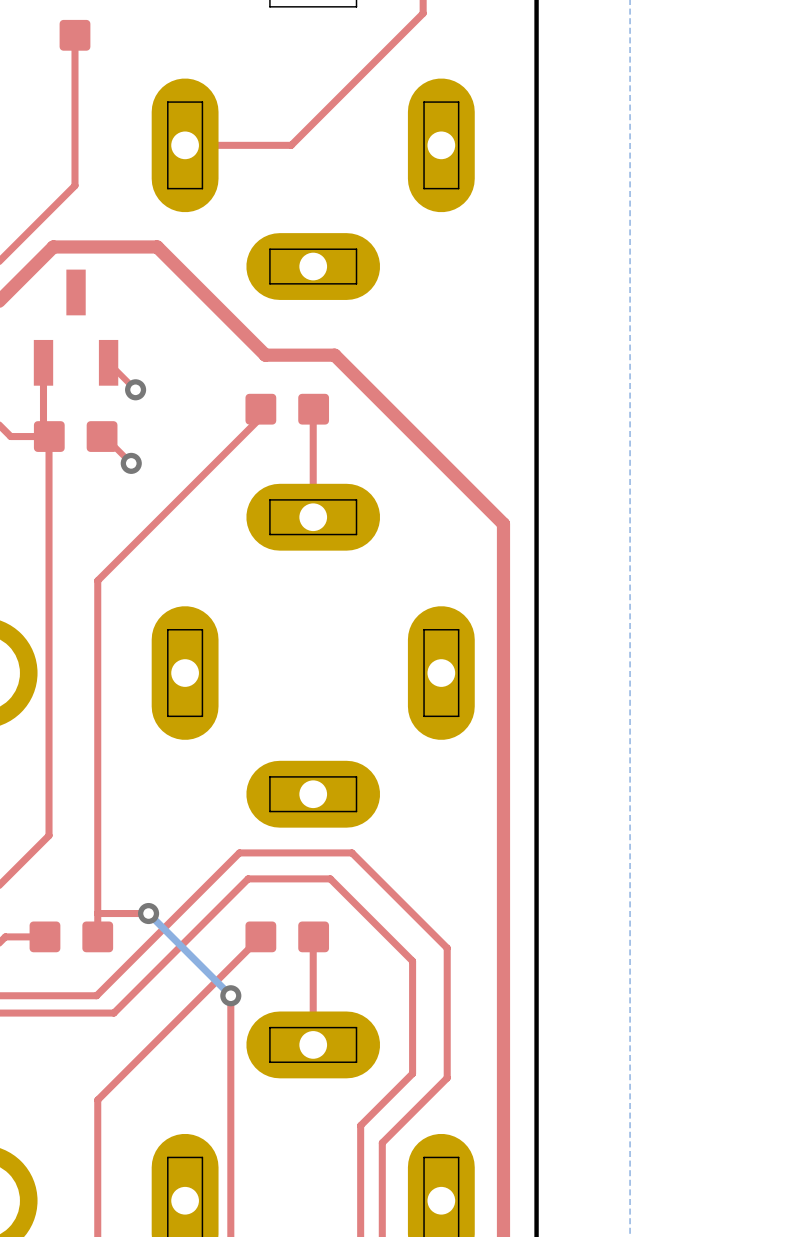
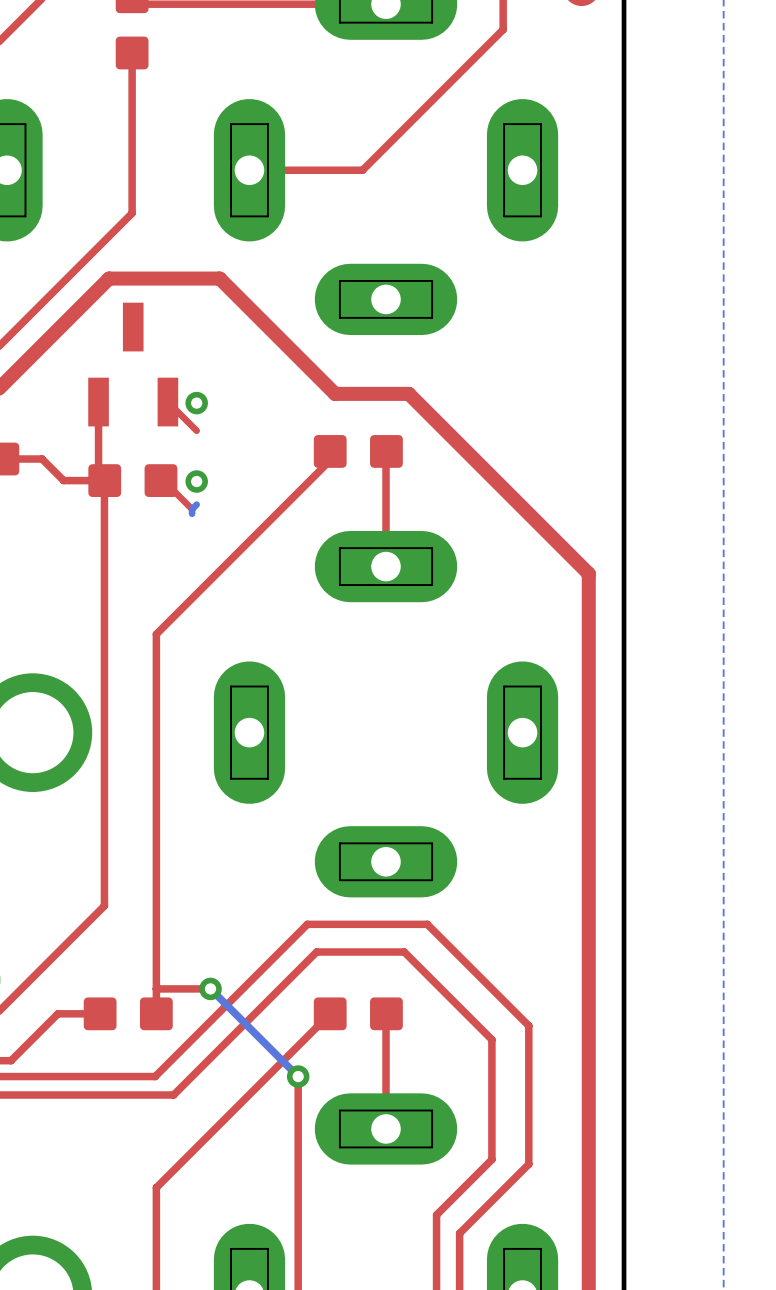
via: none -> (196, 403)
via: (135, 389) -> none
via: none -> (196, 481)
via: (131, 463) -> none

